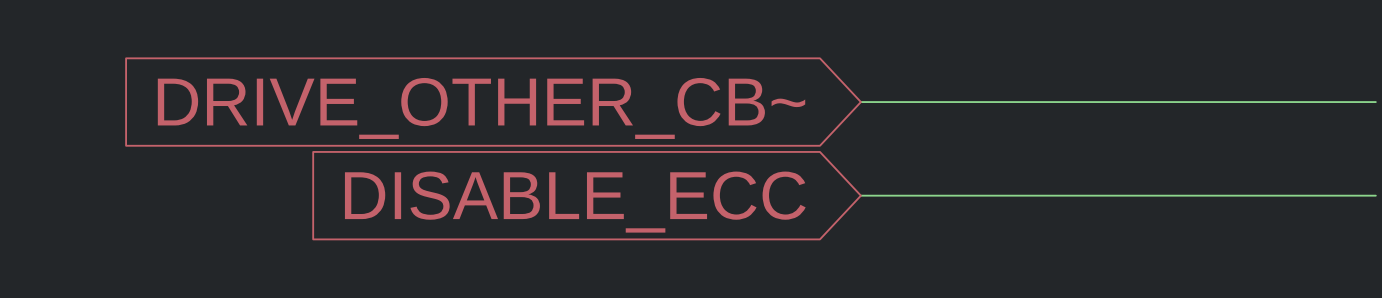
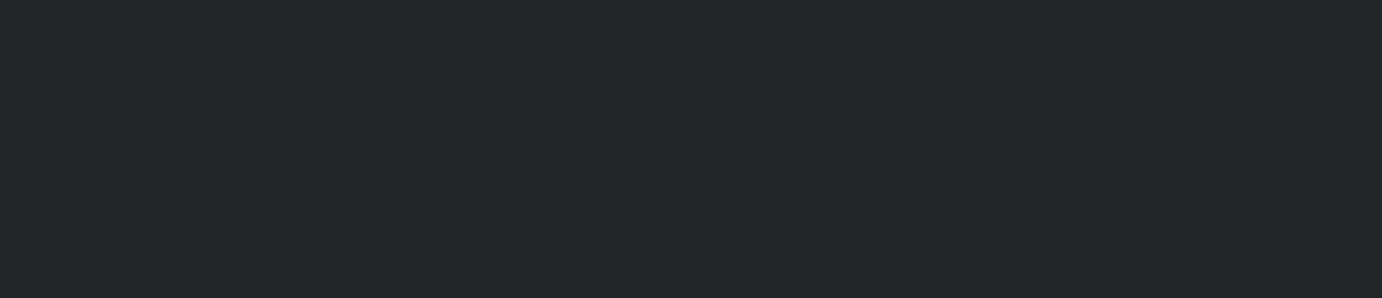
wire: (860, 102) (1375, 102) -> none
global label: DRIVE_OTHER_CB~ (481, 108) -> none
wire: (860, 195) (1375, 195) -> none
global label: DISABLE_ECC (575, 202) -> none

